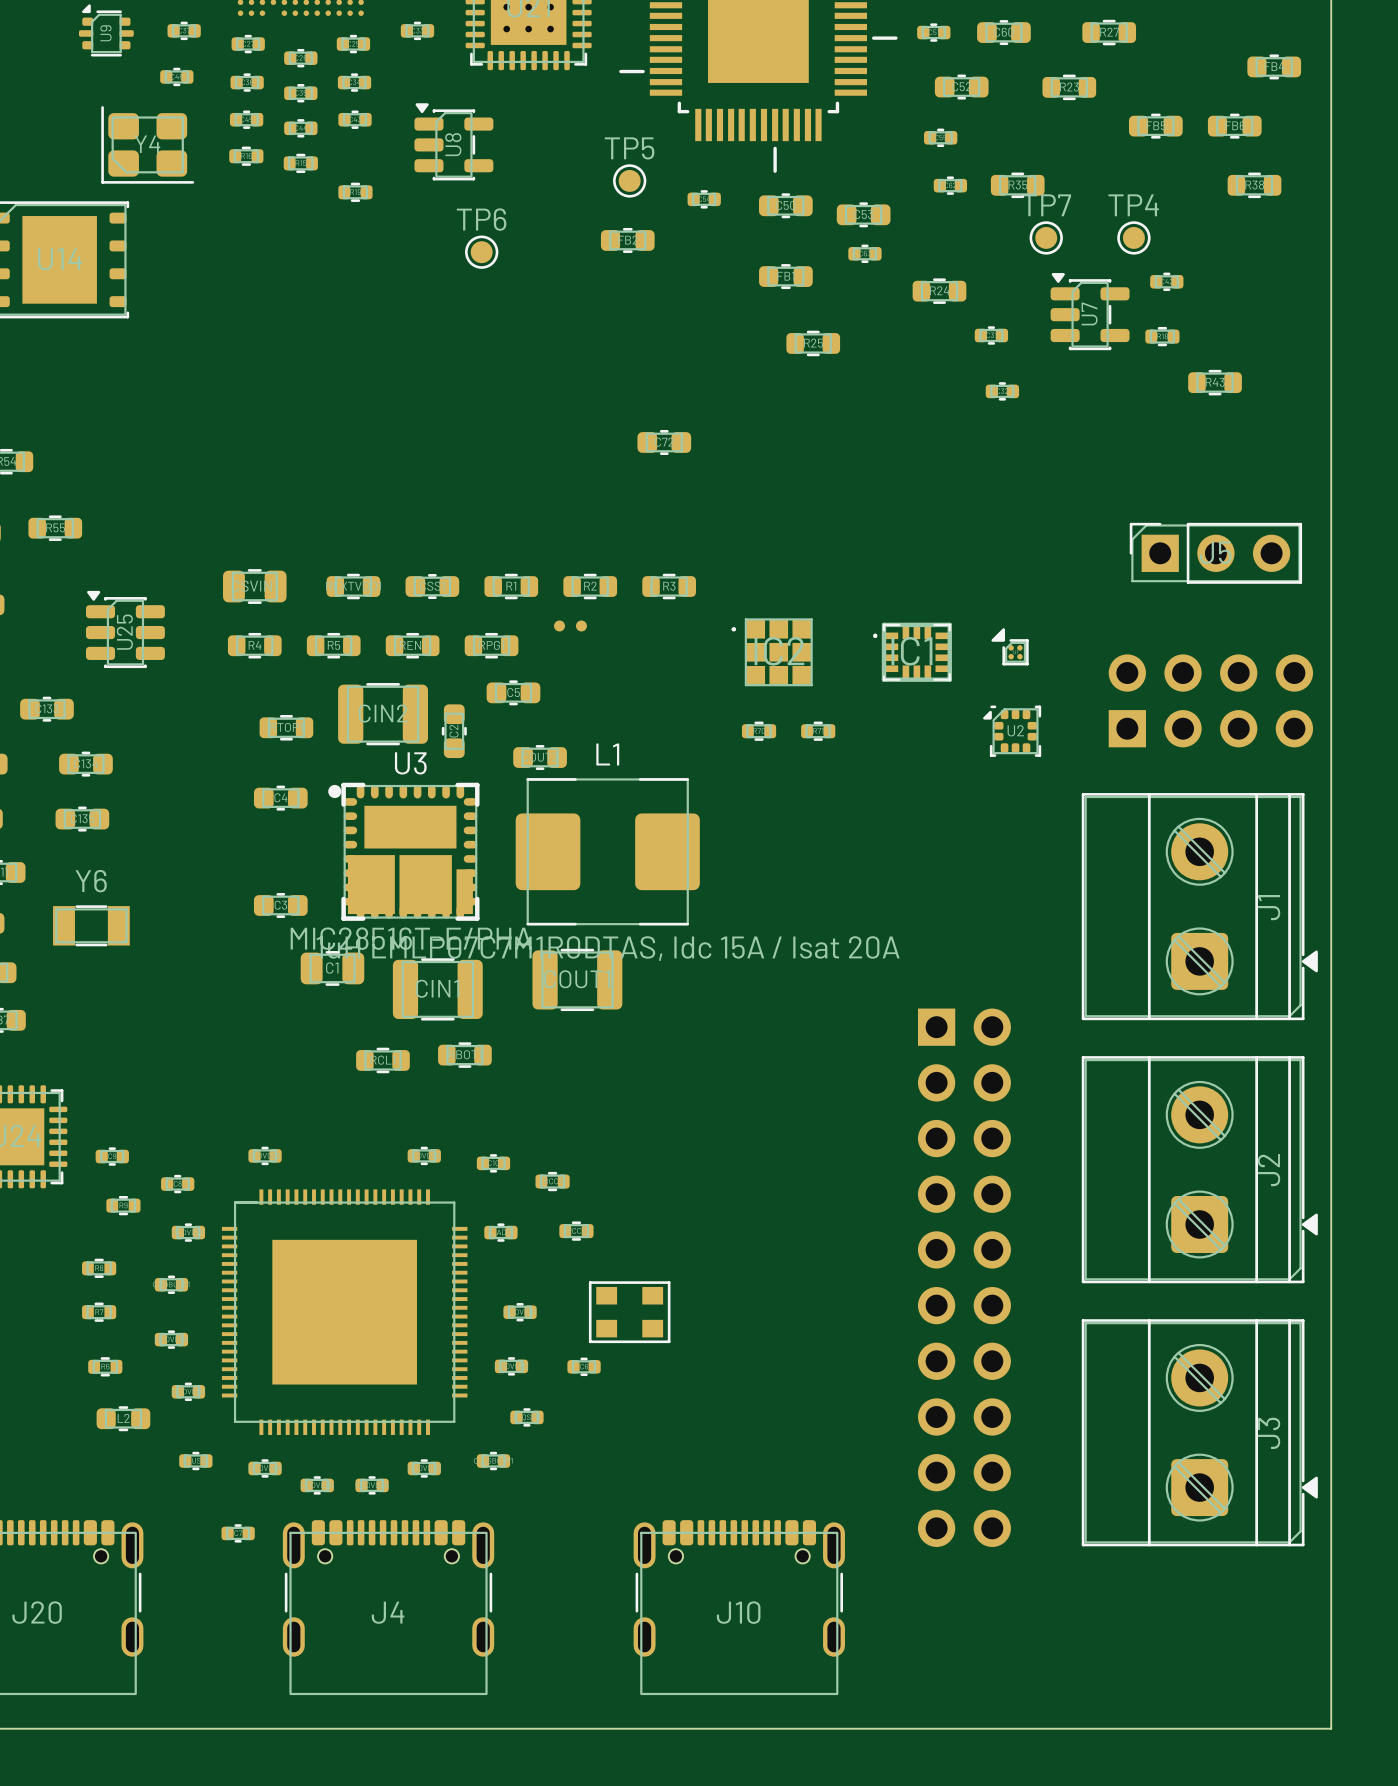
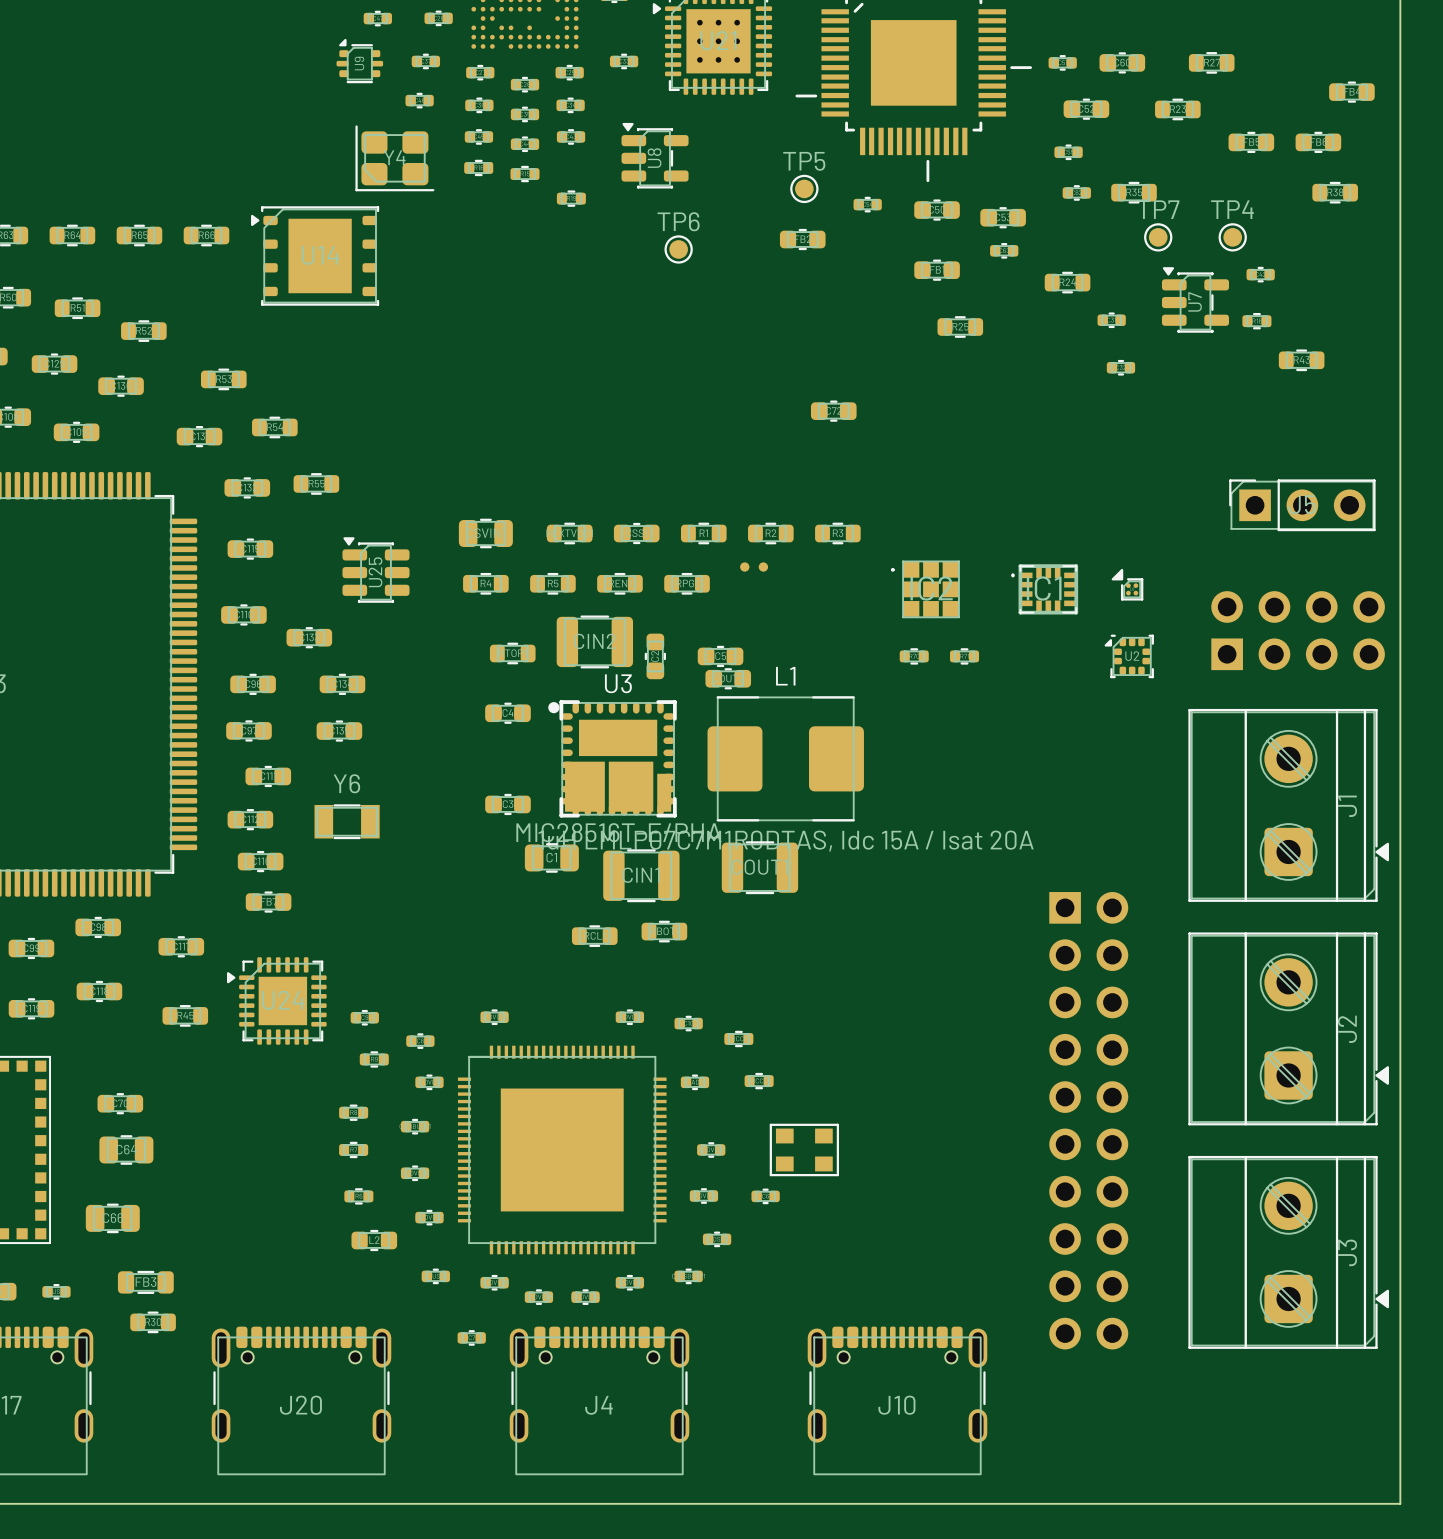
C5 position: (513, 692) -> (720, 656)

